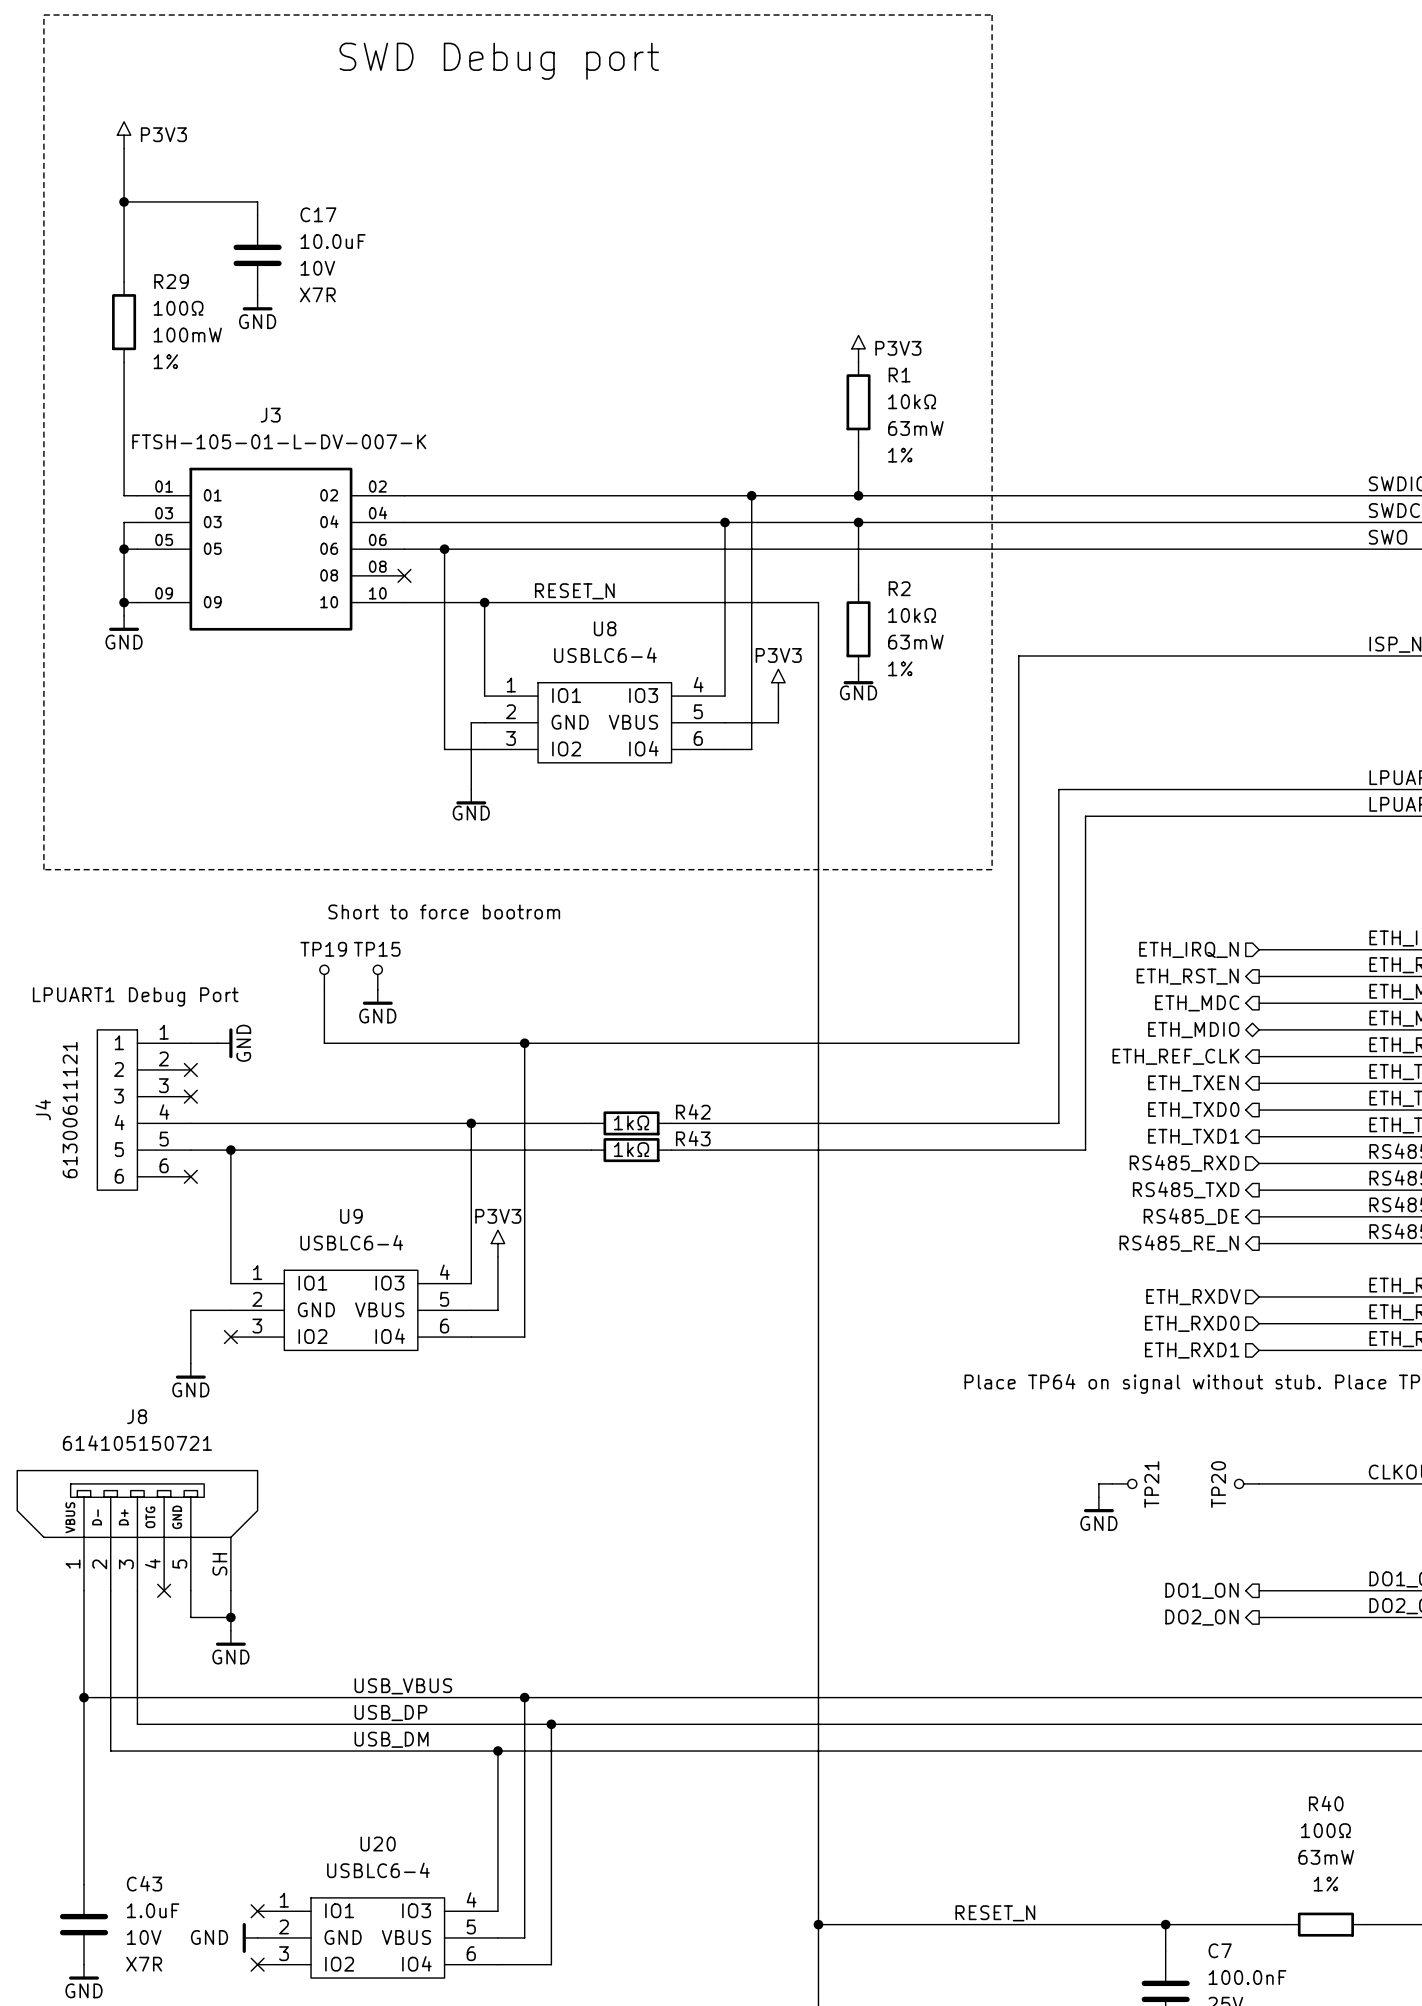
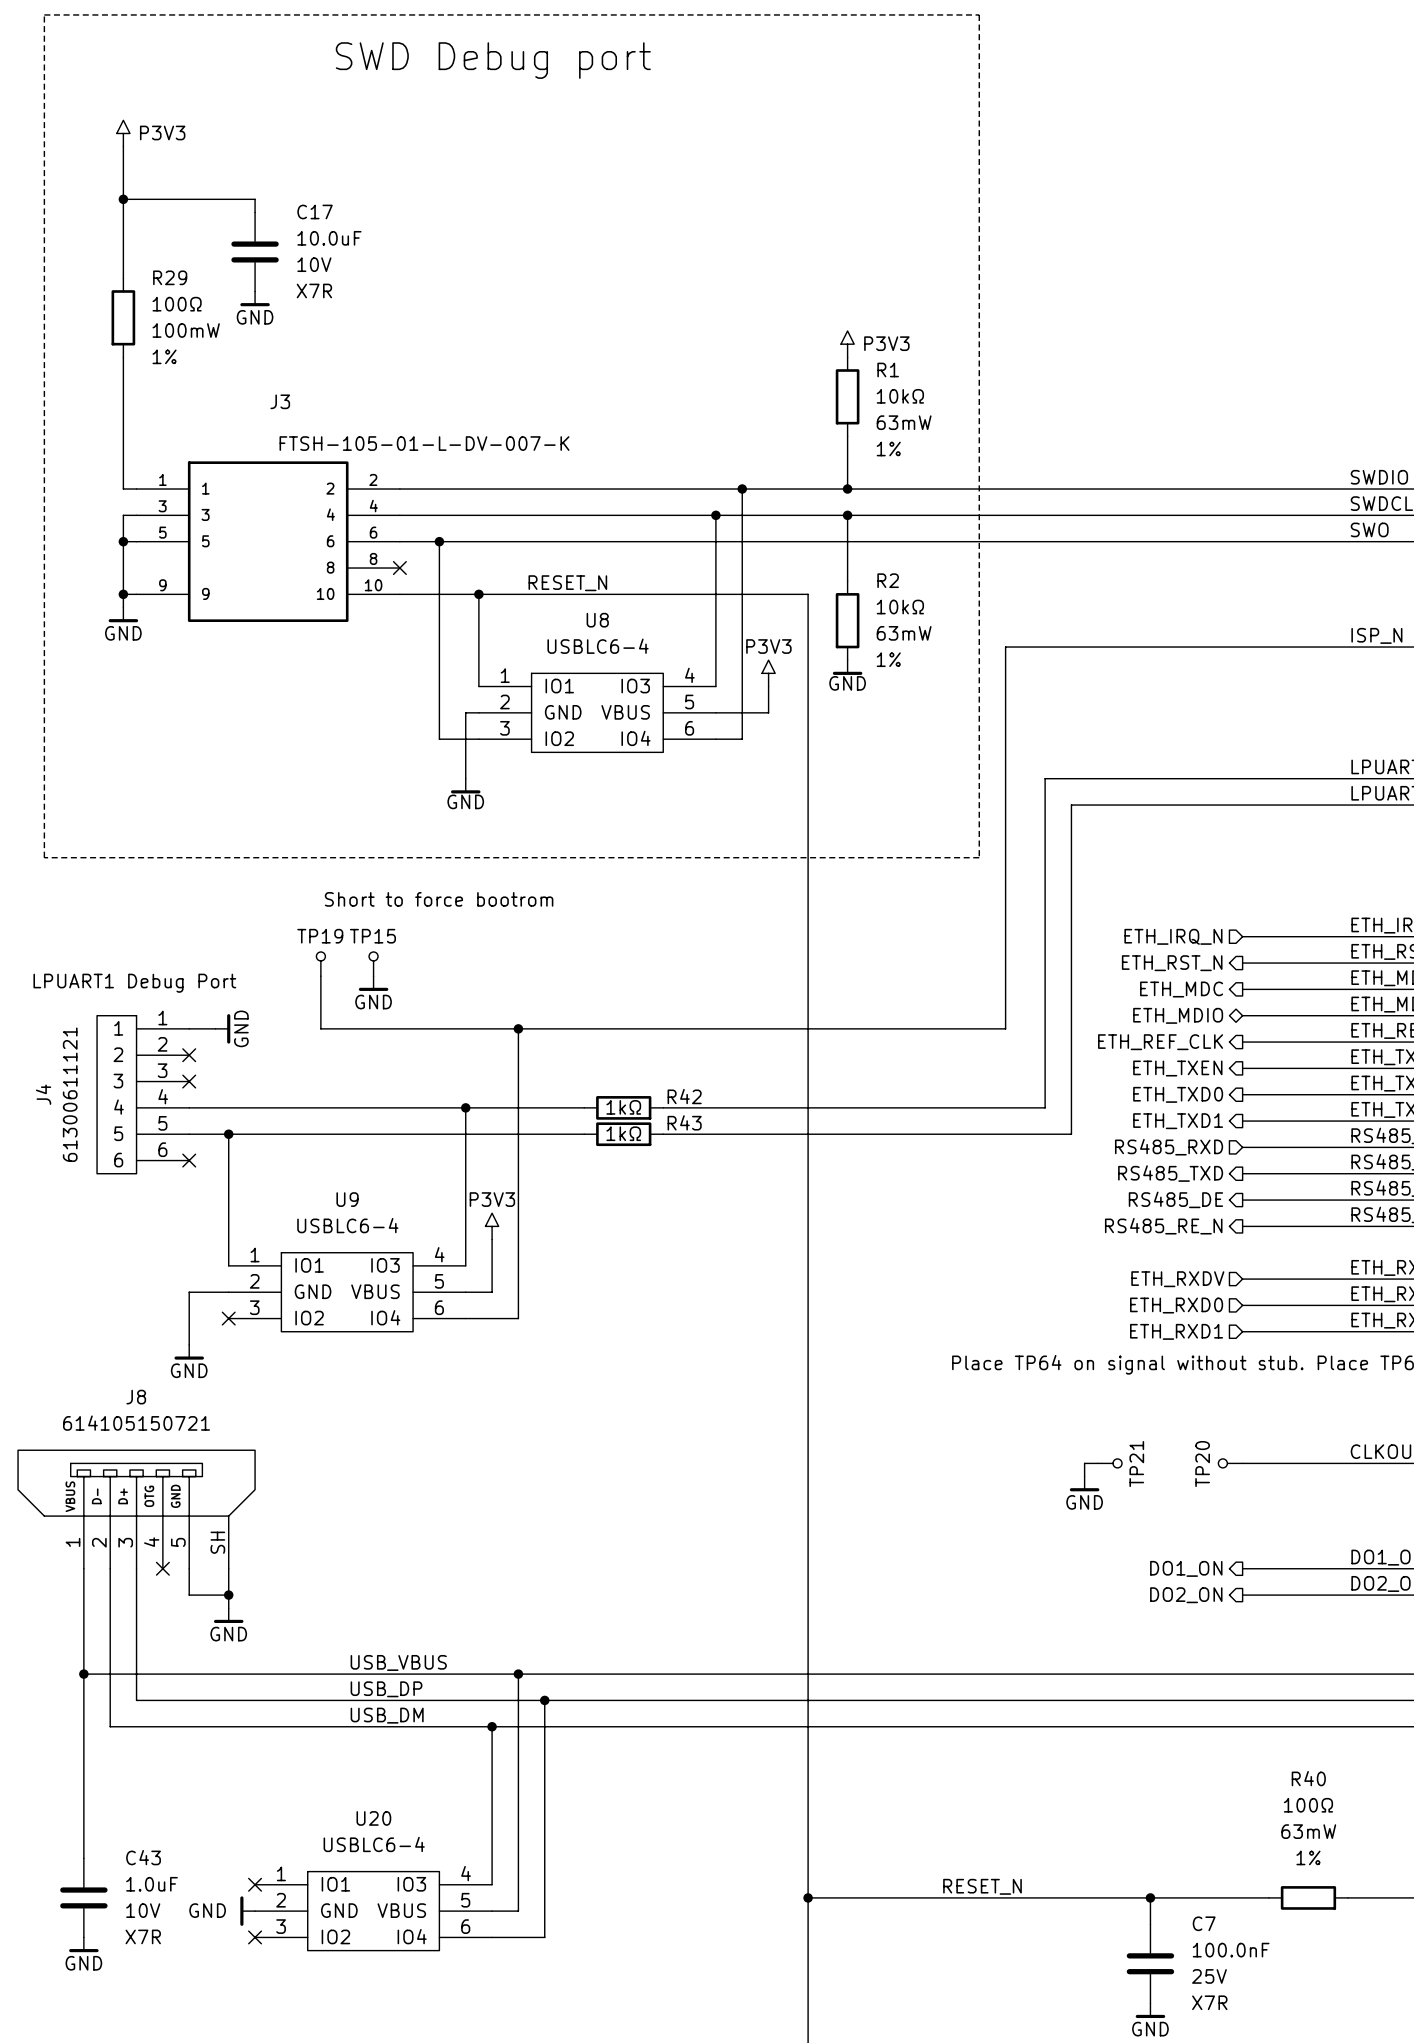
J3 value position: FTSH-105-01-L-DV-007-K (279, 441) -> FTSH-105-01-L-DV-007-K (424, 443)
J3 symbol: [137, 467, 405, 631] -> [136, 461, 400, 623]

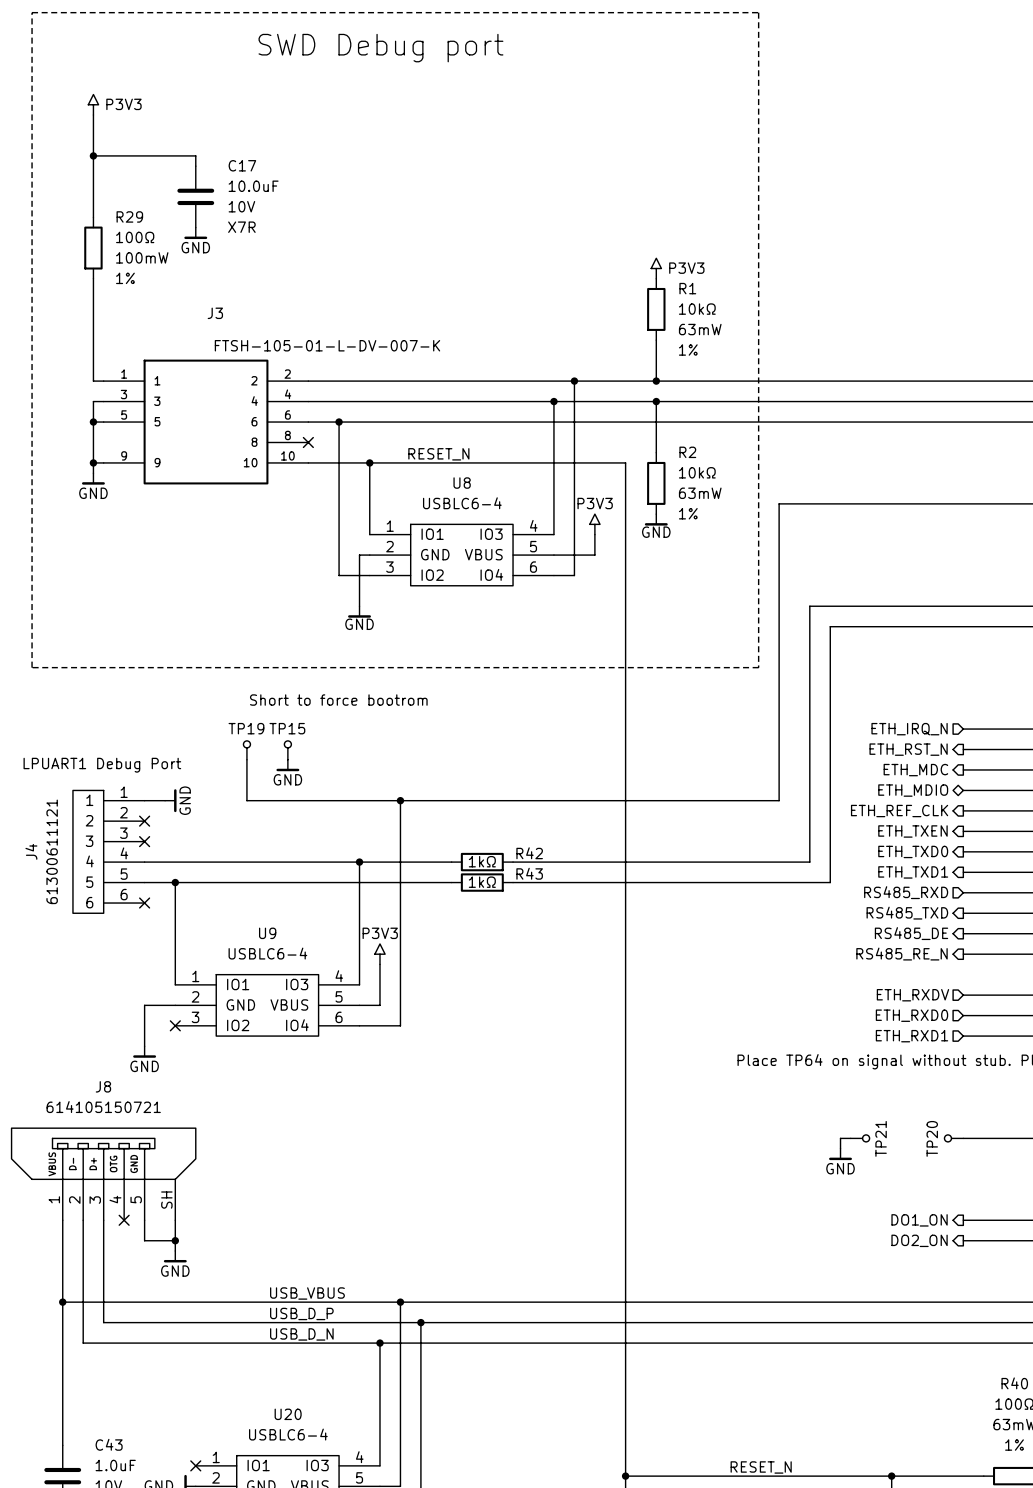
label: USB_DP (386, 1689) -> USB_D_P (301, 1313)
label: USB_DM (387, 1715) -> USB_D_N (301, 1334)

